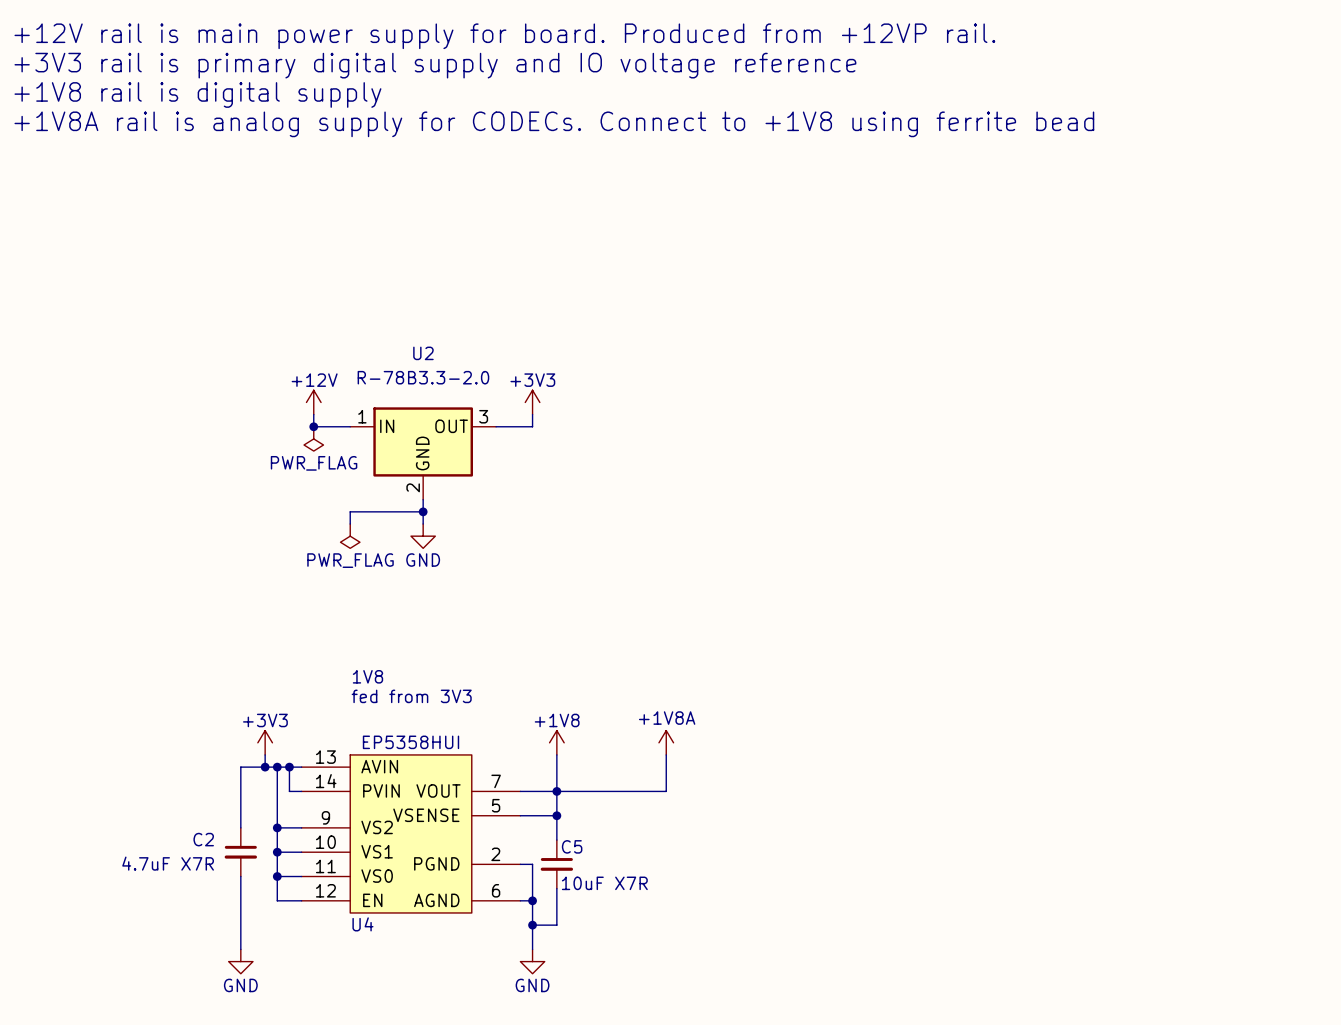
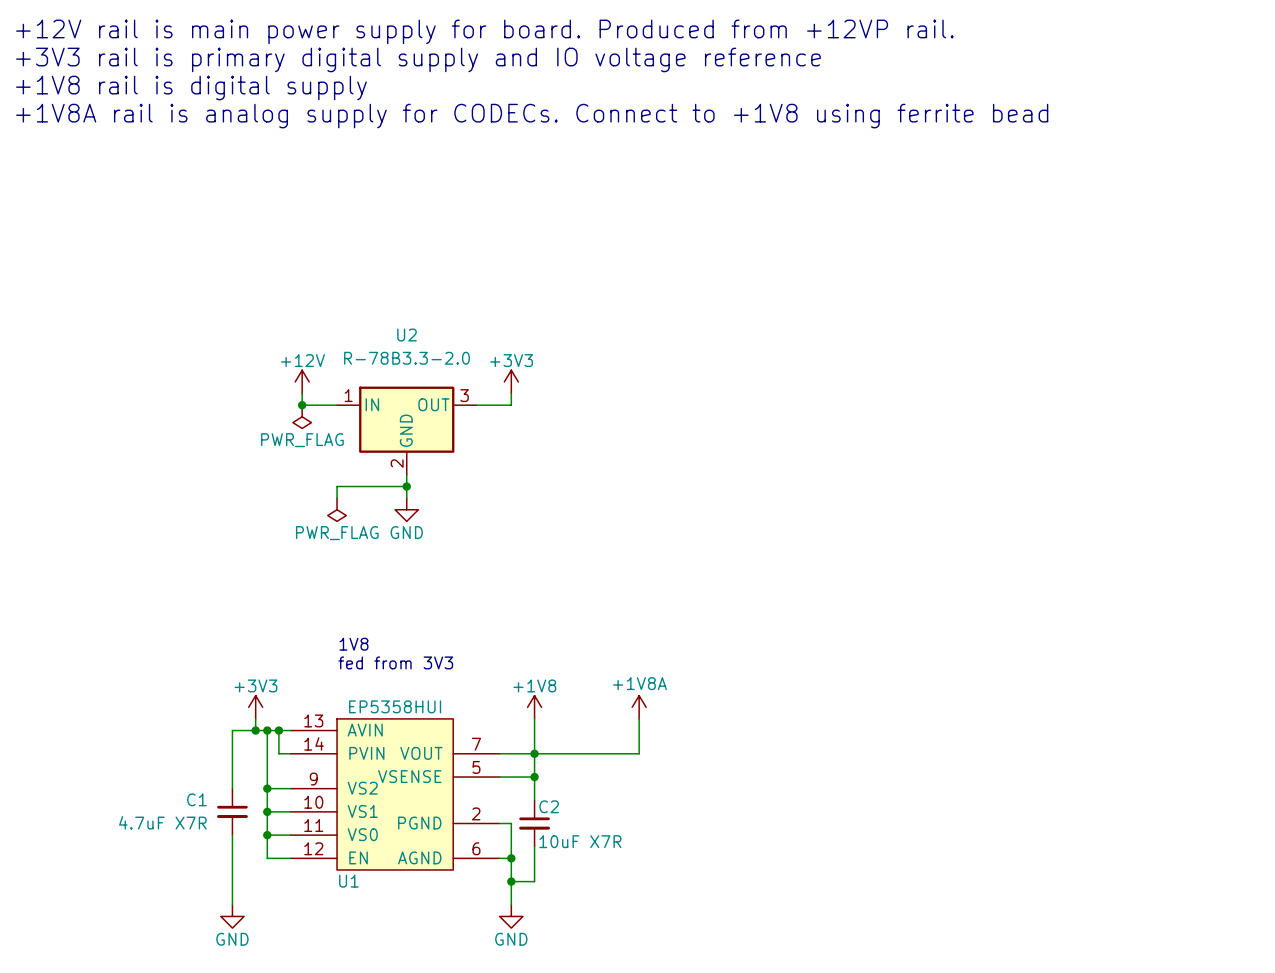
C2 name: C2 (203, 839) -> C1 (196, 799)
C5 name: C5 (572, 846) -> C2 (549, 806)
U4 name: U4 (362, 924) -> U1 (348, 881)

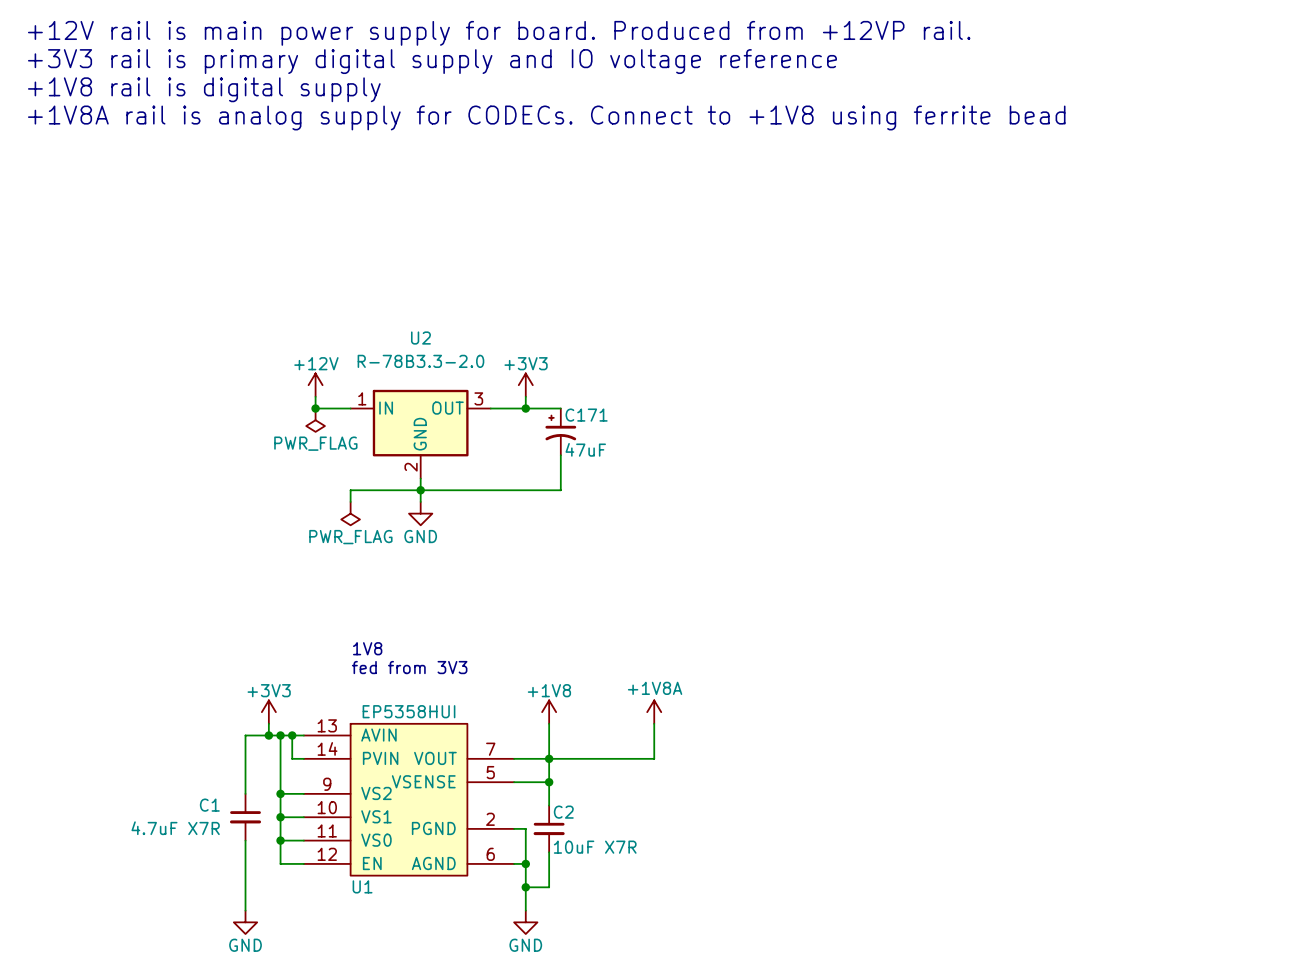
wire: none -> (525, 408) (560, 408)
junction: none -> (525, 408)
C171: none -> 47uF (560, 431)
wire: none -> (560, 455) (560, 490) (420, 490)

